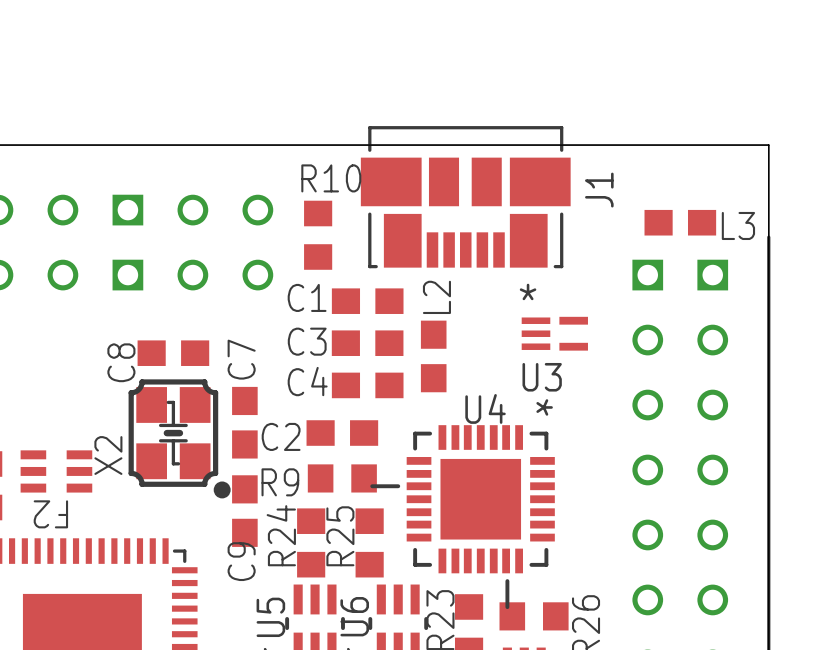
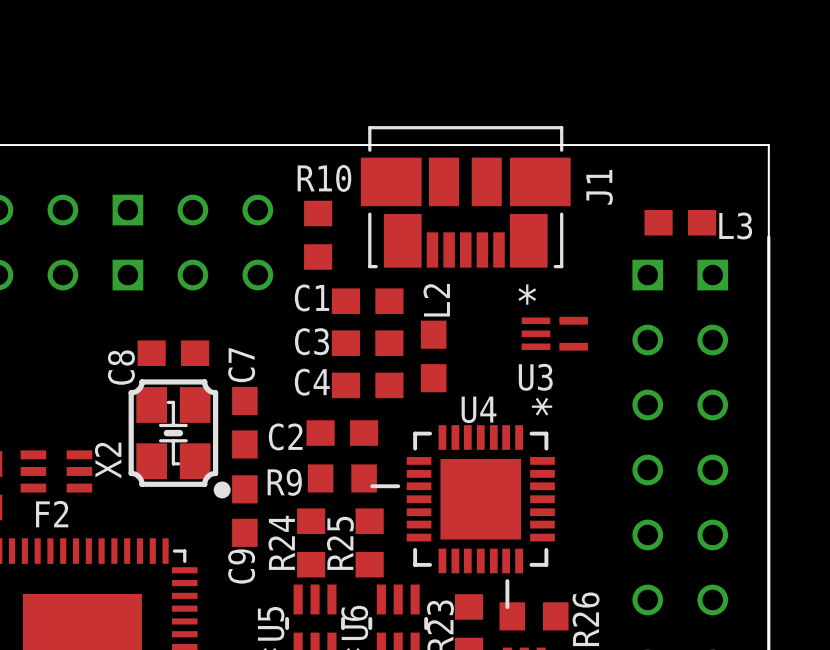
F2 name rotation: 0° (50, 514) -> 180° (52, 514)

